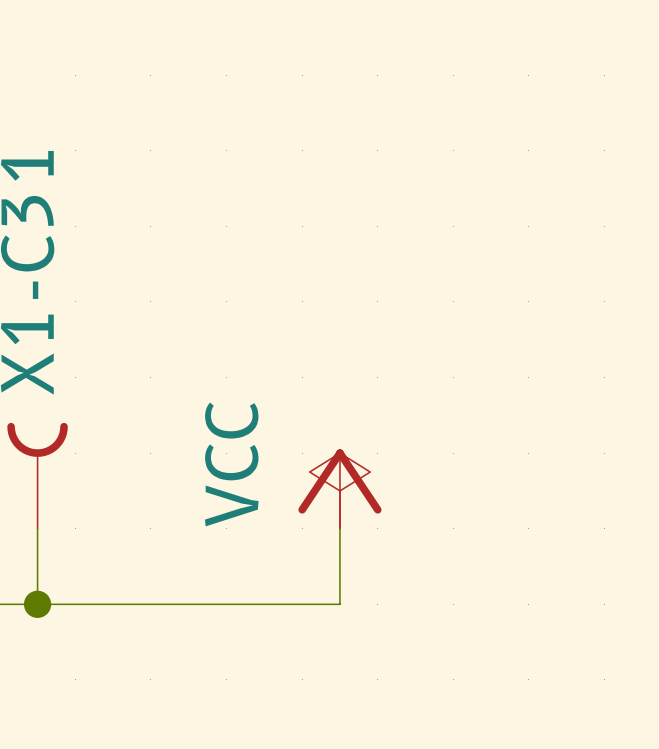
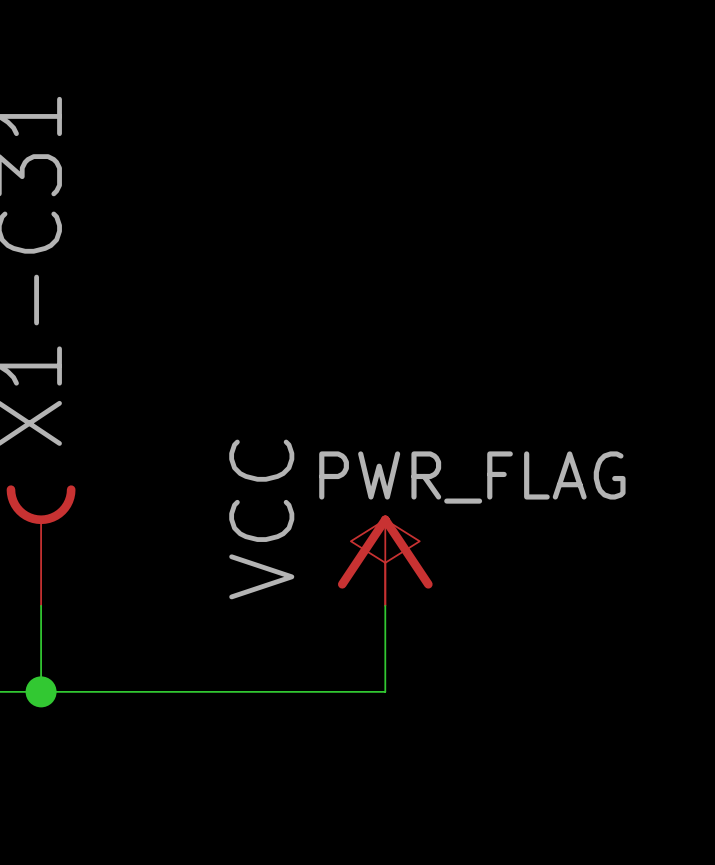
power symbol text: none -> PWR_FLAG (472, 477)

